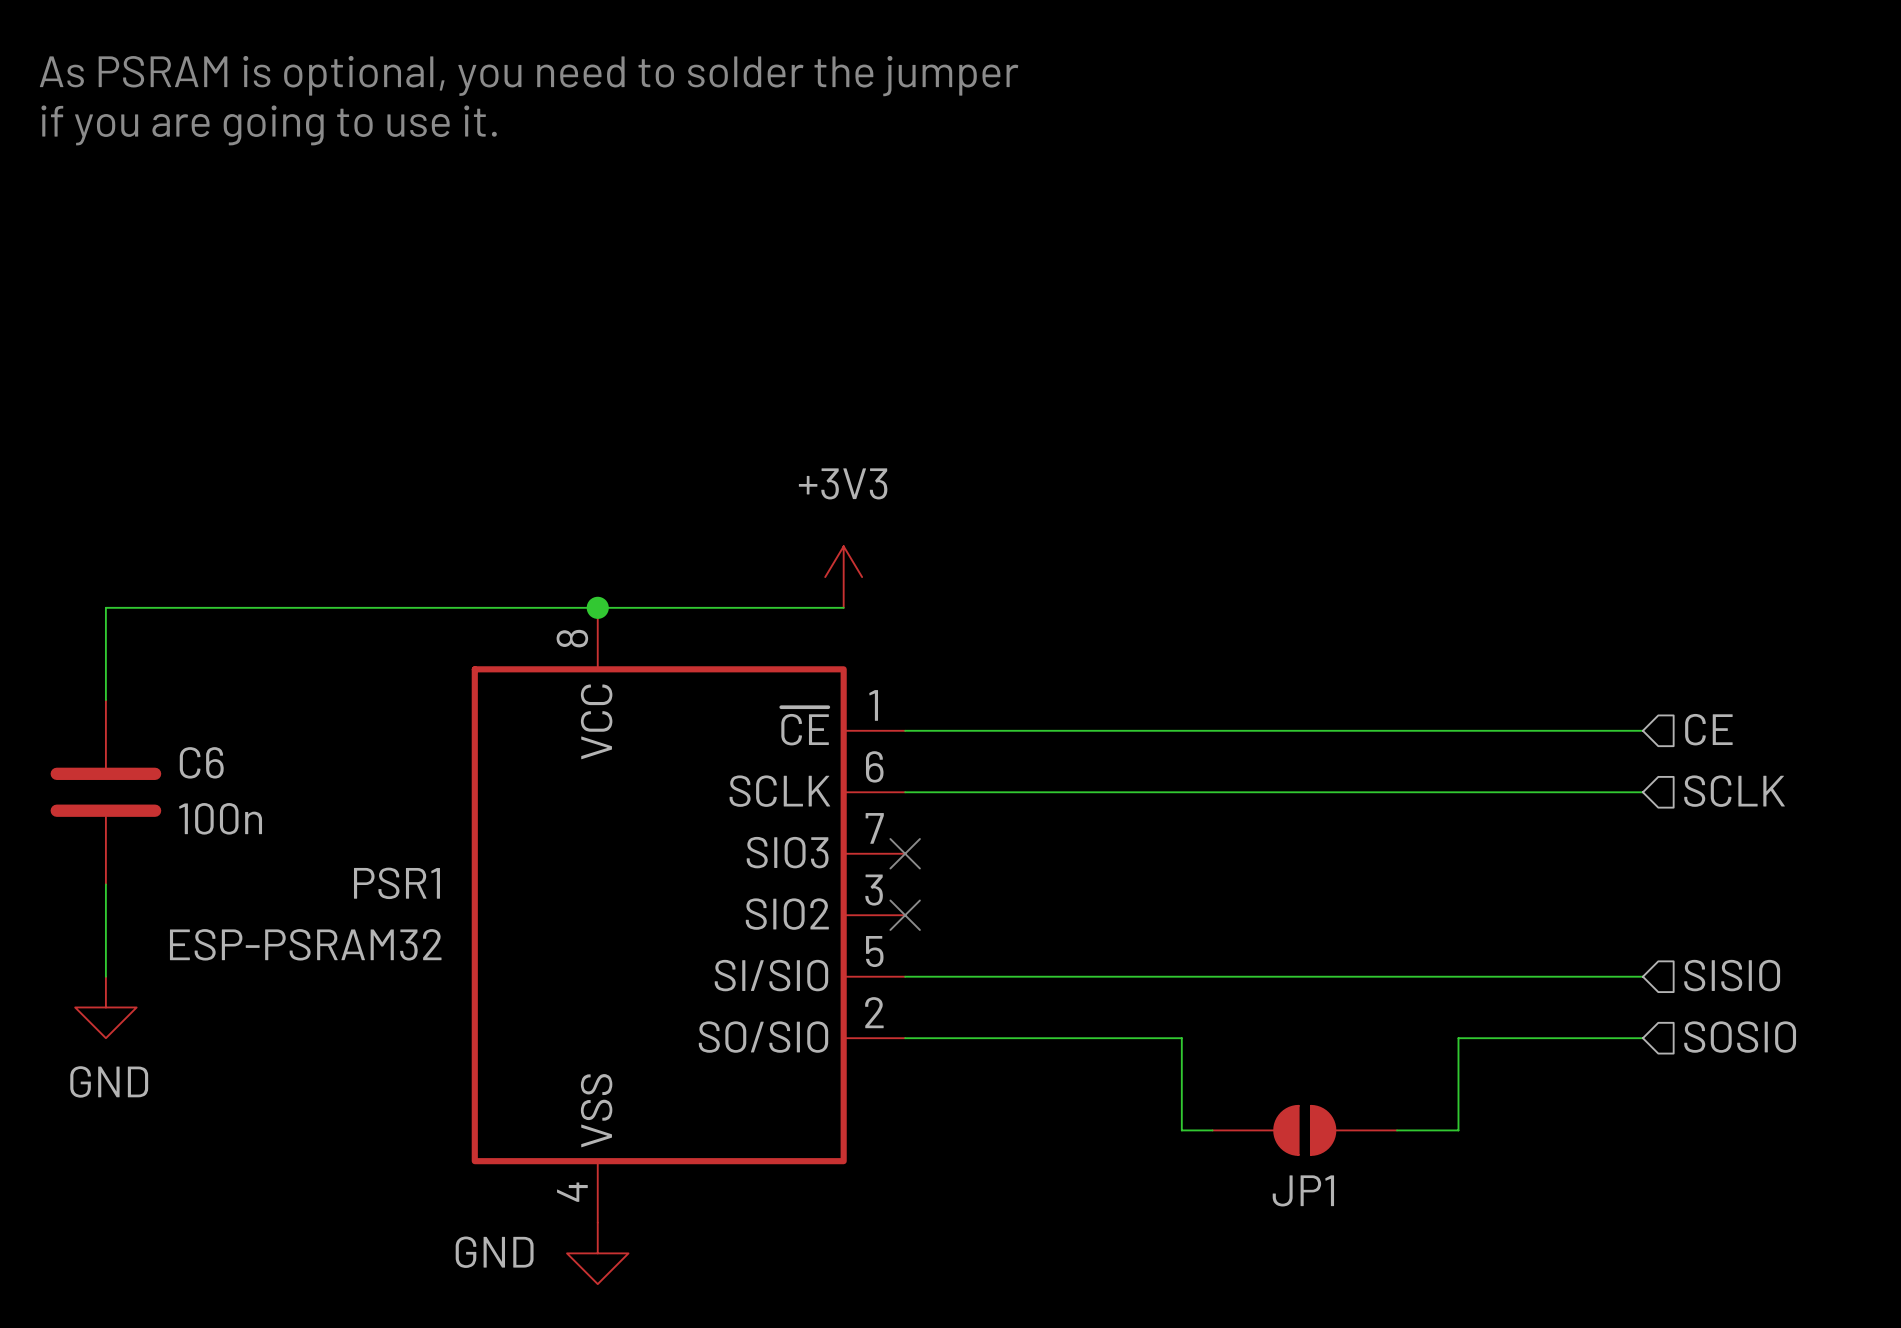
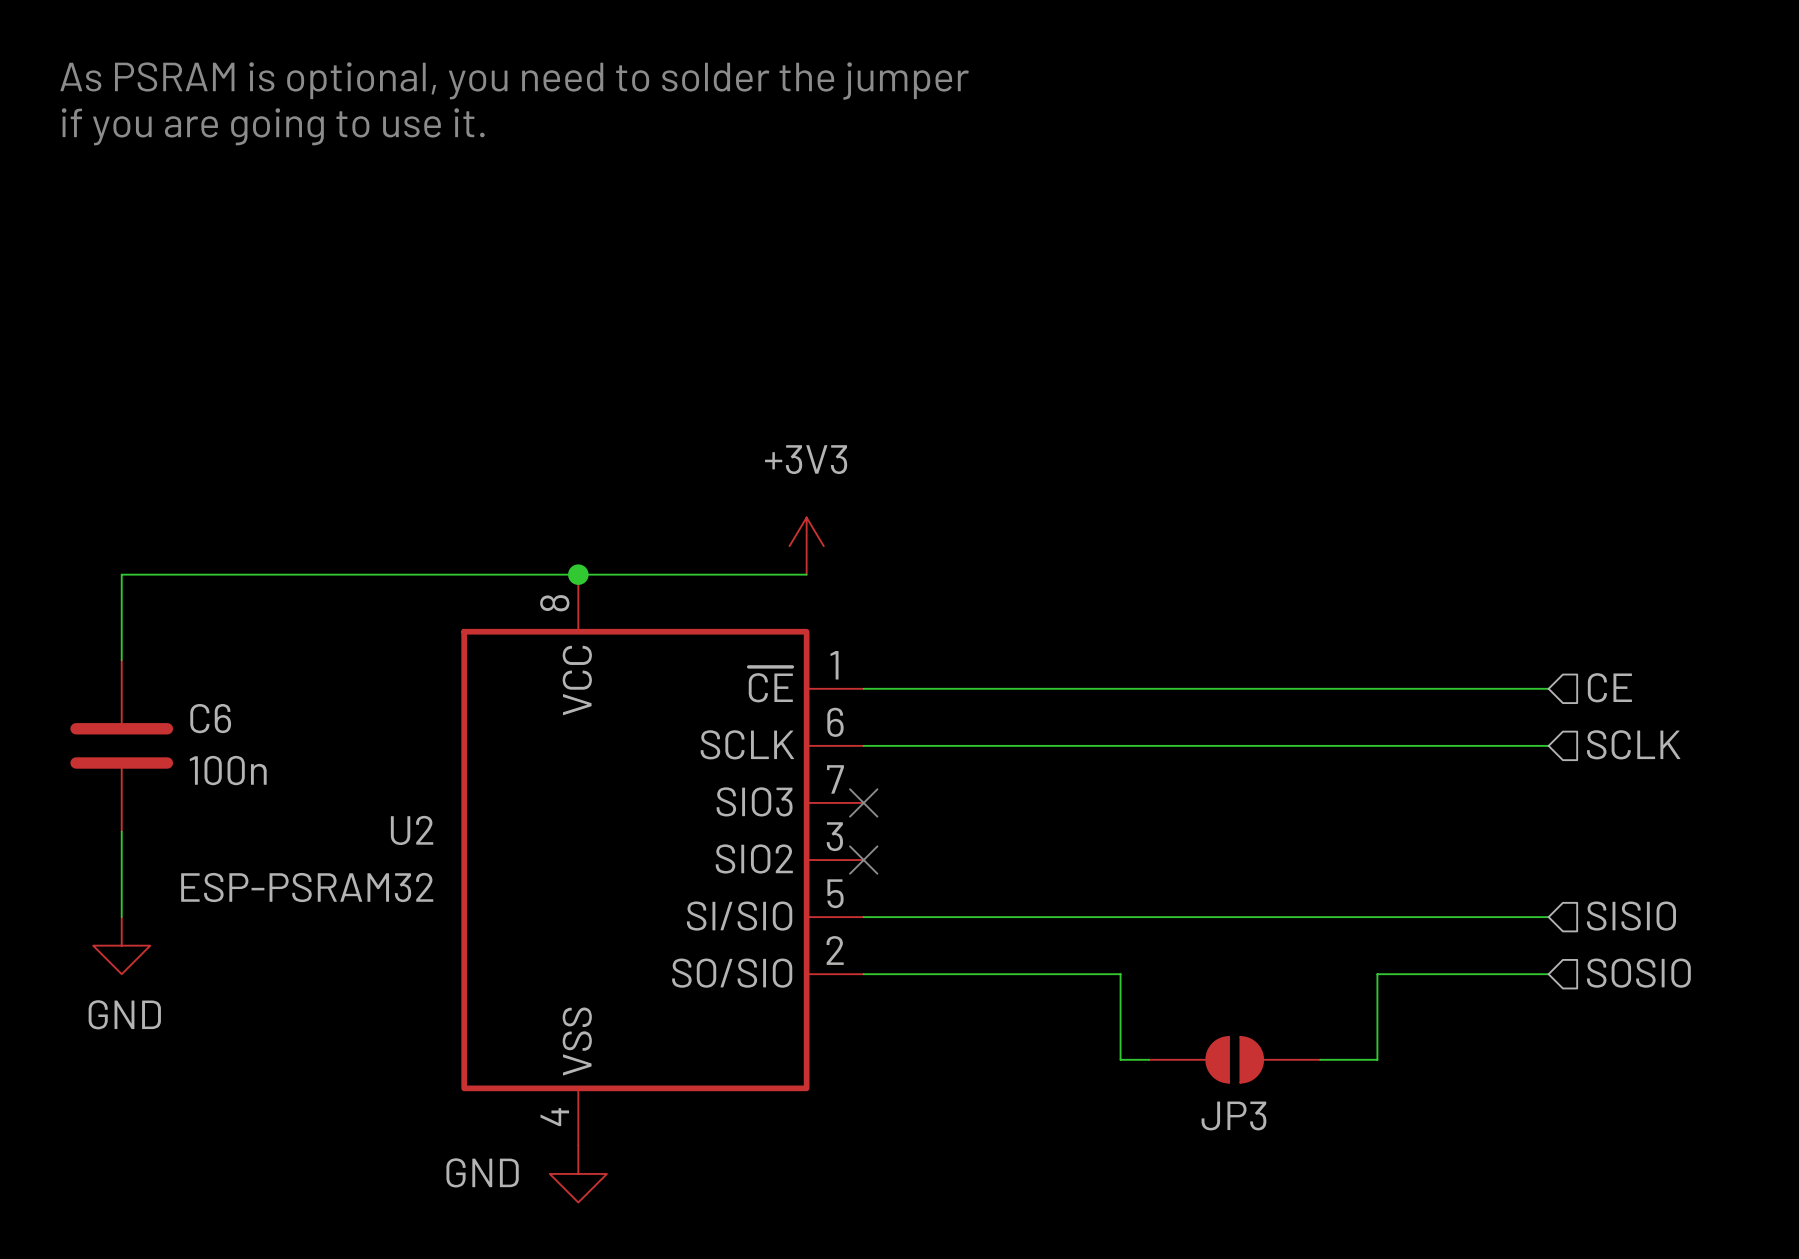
PSR1 name: PSR1 (396, 883) -> U2 (412, 830)
JP1 name: JP1 (1303, 1190) -> JP3 (1233, 1115)

